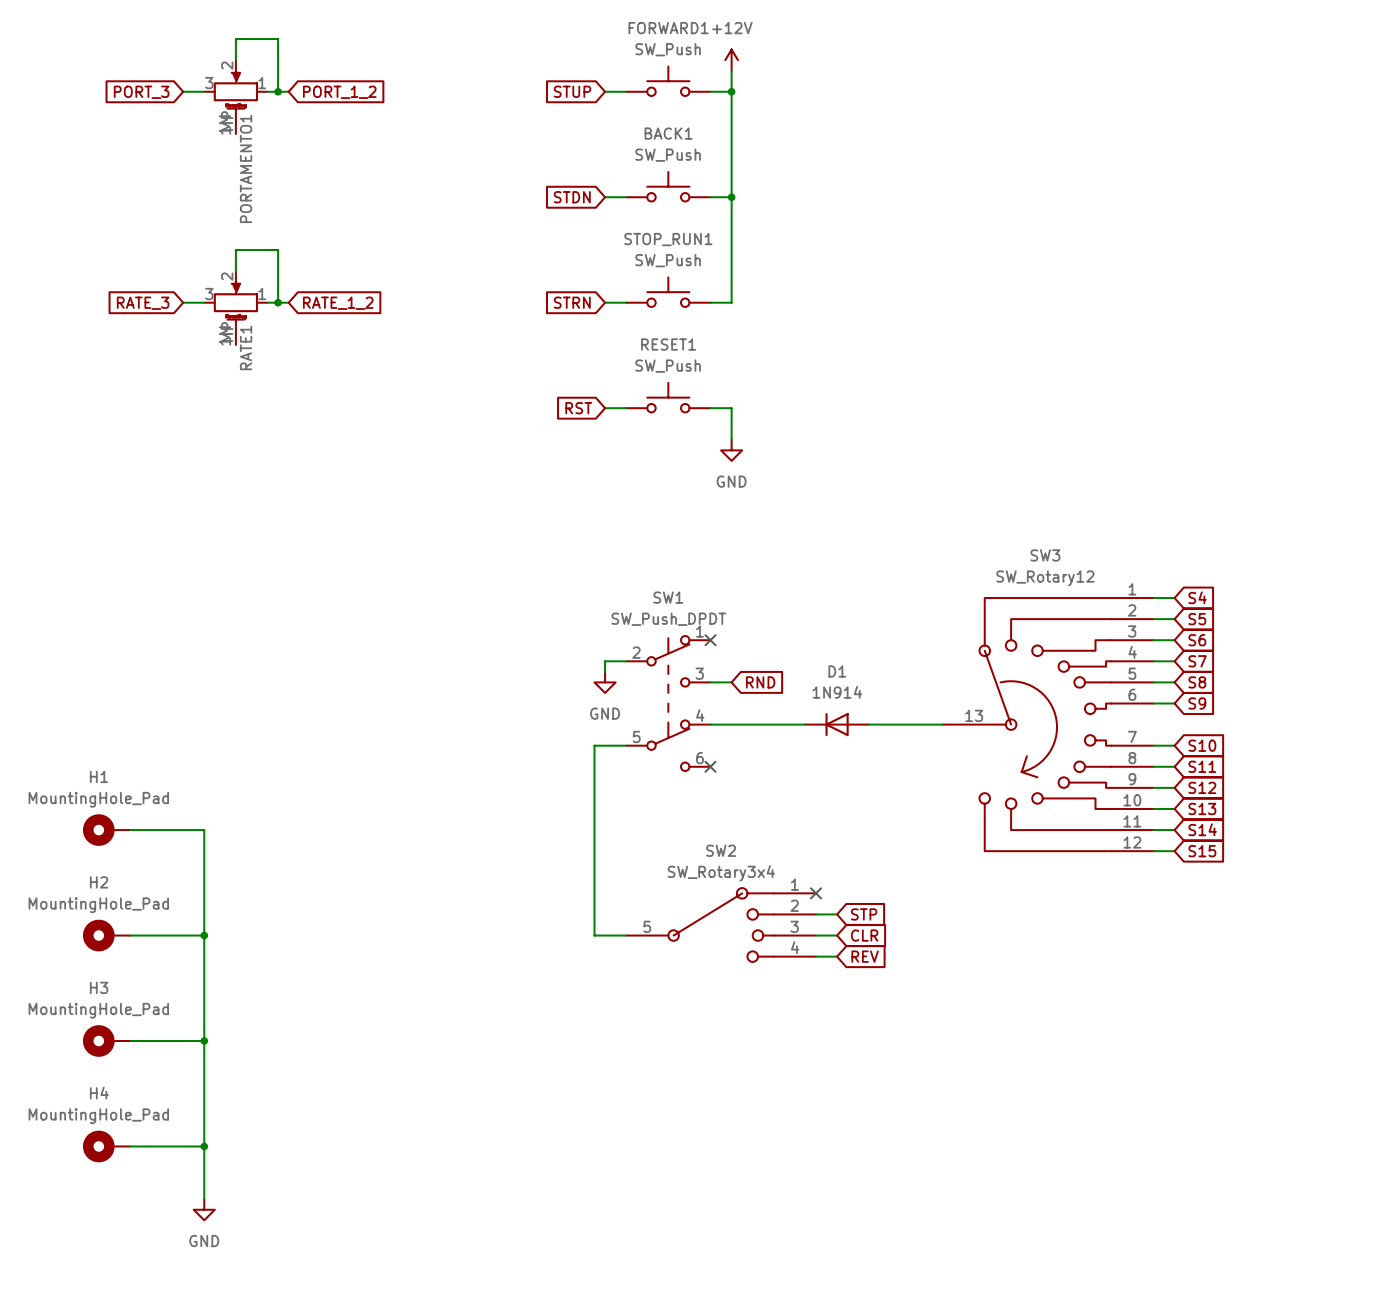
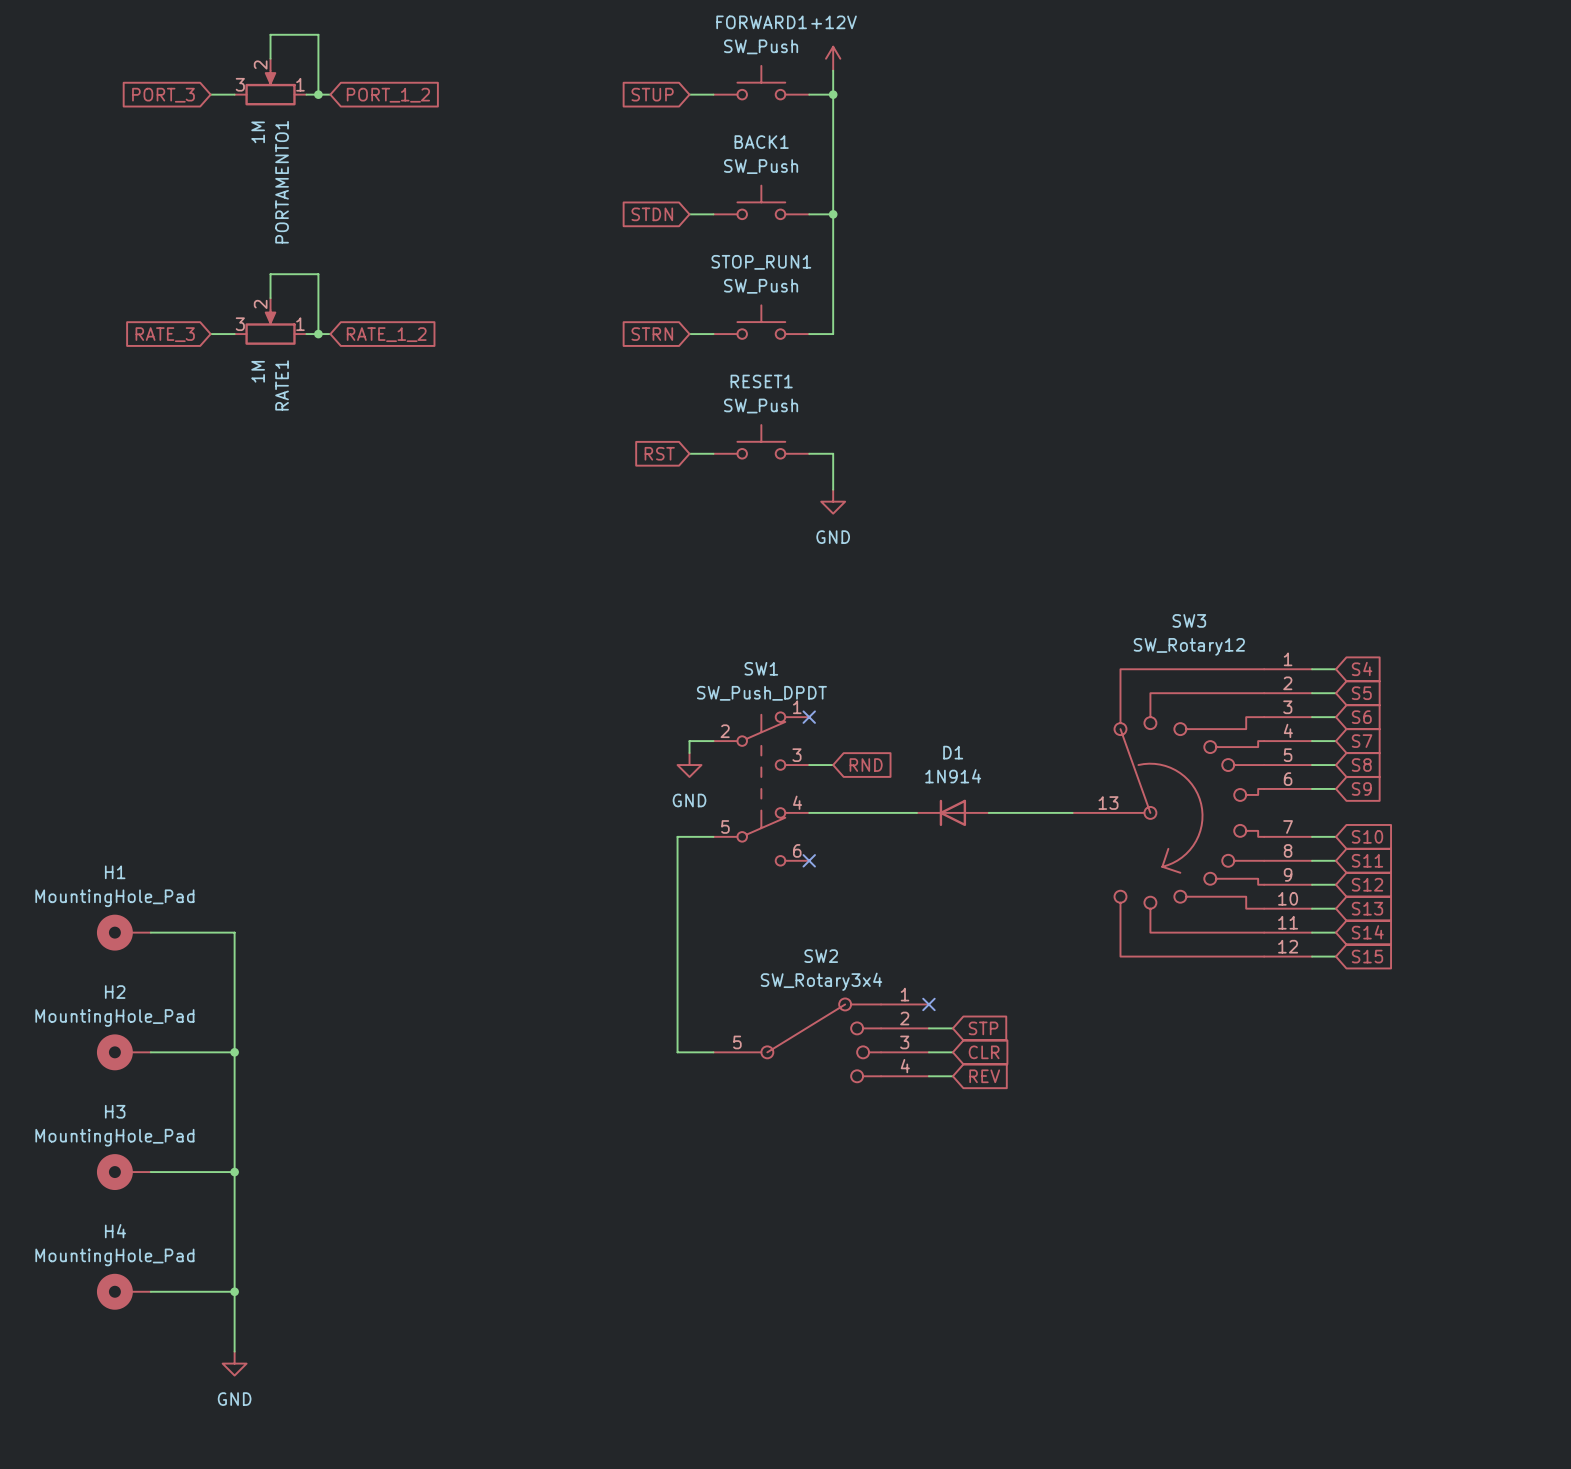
PORTAMENTO1 symbol: [204, 60, 268, 134] -> [234, 58, 307, 106]
RATE1 symbol: [204, 271, 268, 345] -> [234, 298, 307, 345]

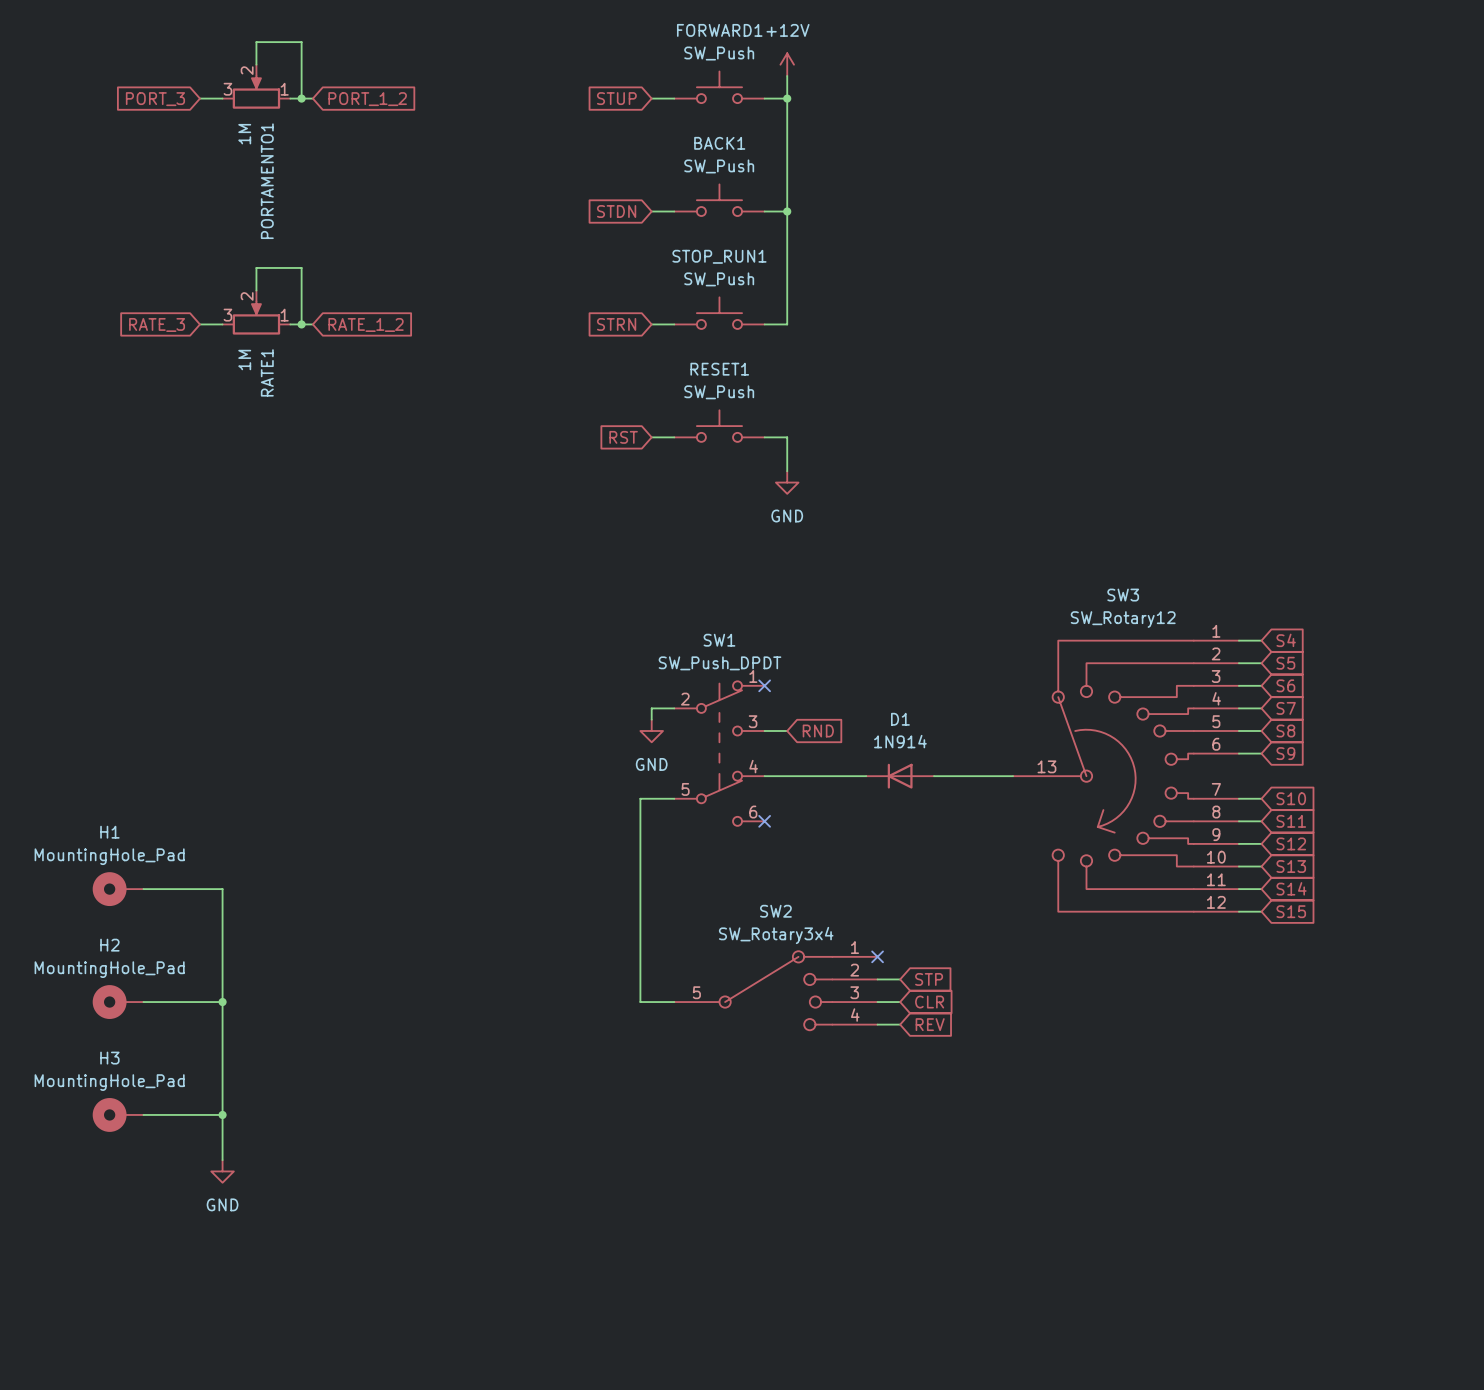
wire: (234, 1219) (234, 1351) -> none
H4: MountingHole_Pad (123, 1291) -> none
wire: (150, 1291) (234, 1291) -> none
junction: (234, 1291) -> none
power symbol position: GND (234, 1363) -> GND (222, 1171)

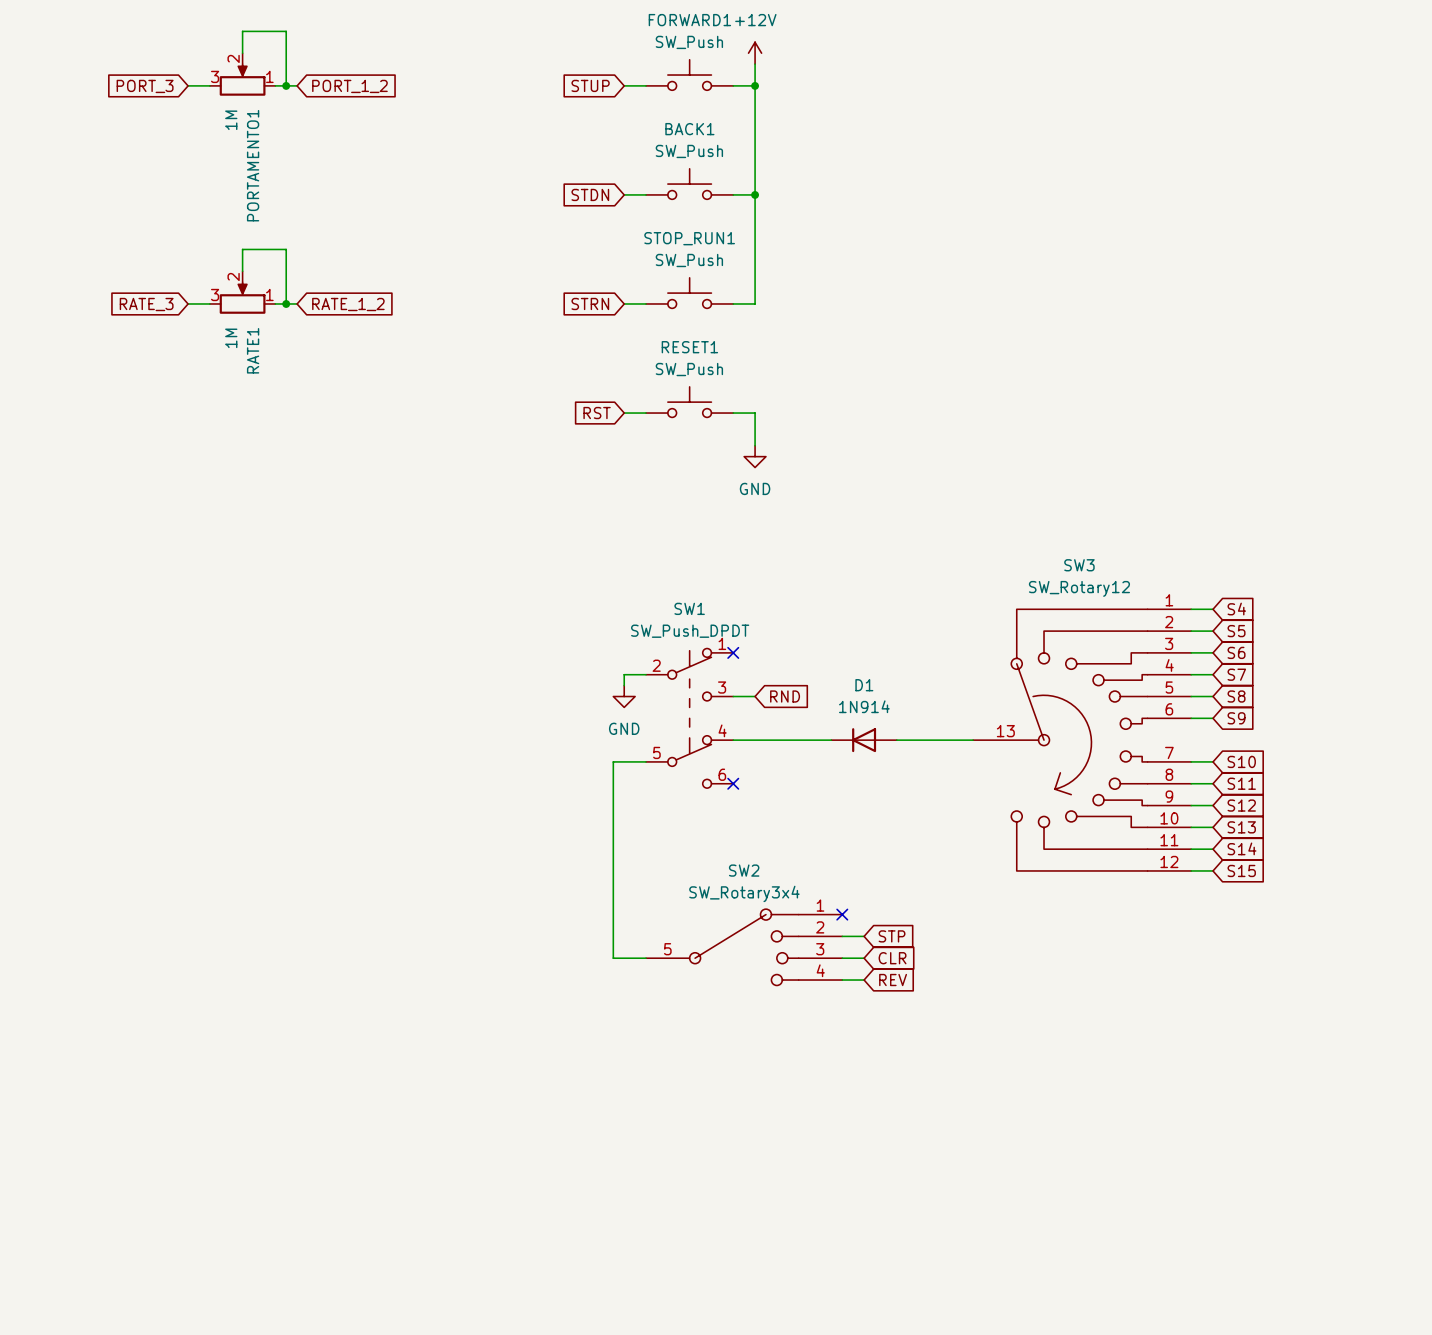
H1: MountingHole_Pad (118, 889) -> none
wire: (143, 889) (222, 889) (222, 1160) -> none
H2: MountingHole_Pad (118, 1002) -> none
wire: (143, 1002) (222, 1002) -> none
junction: (222, 1002) -> none
H3: MountingHole_Pad (118, 1114) -> none
wire: (143, 1114) (222, 1114) -> none
junction: (222, 1114) -> none
power symbol: GND (222, 1171) -> none

